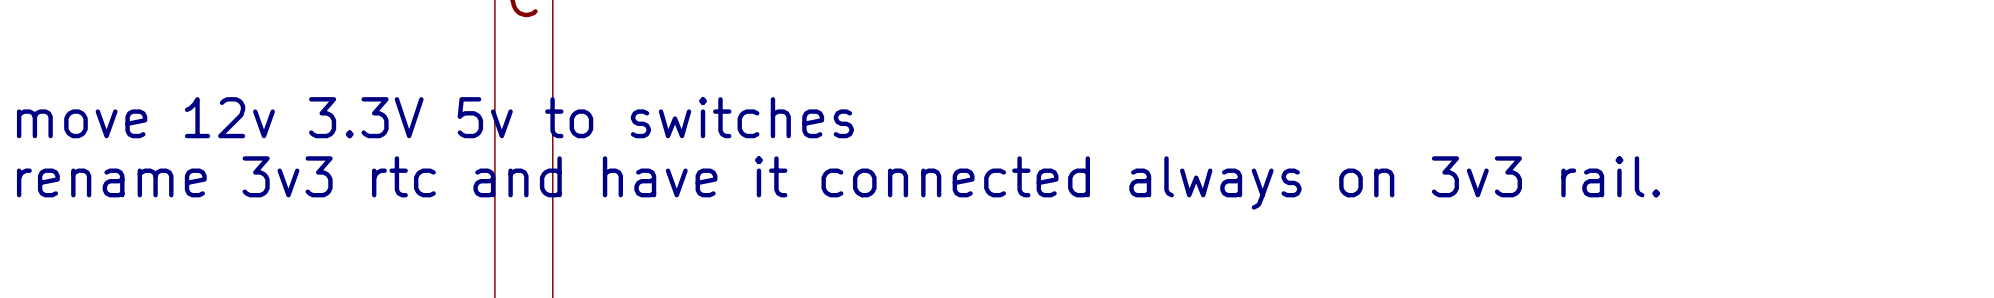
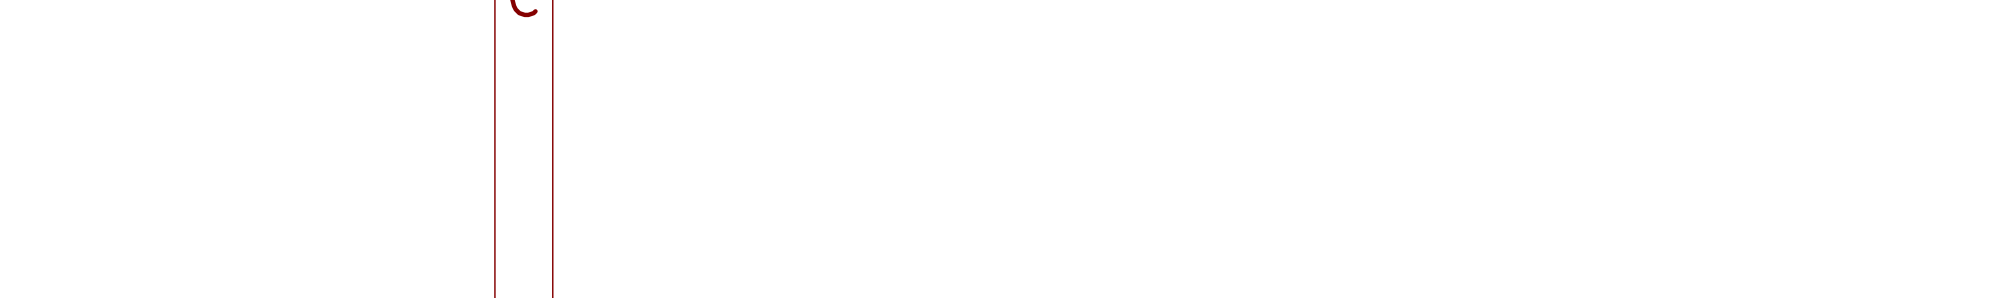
text: move 12v 3.3V 5v to switches (435, 117) -> none
text: rename 3v3 rtc and have it connected always on 3v3 rail. (838, 182) -> none

